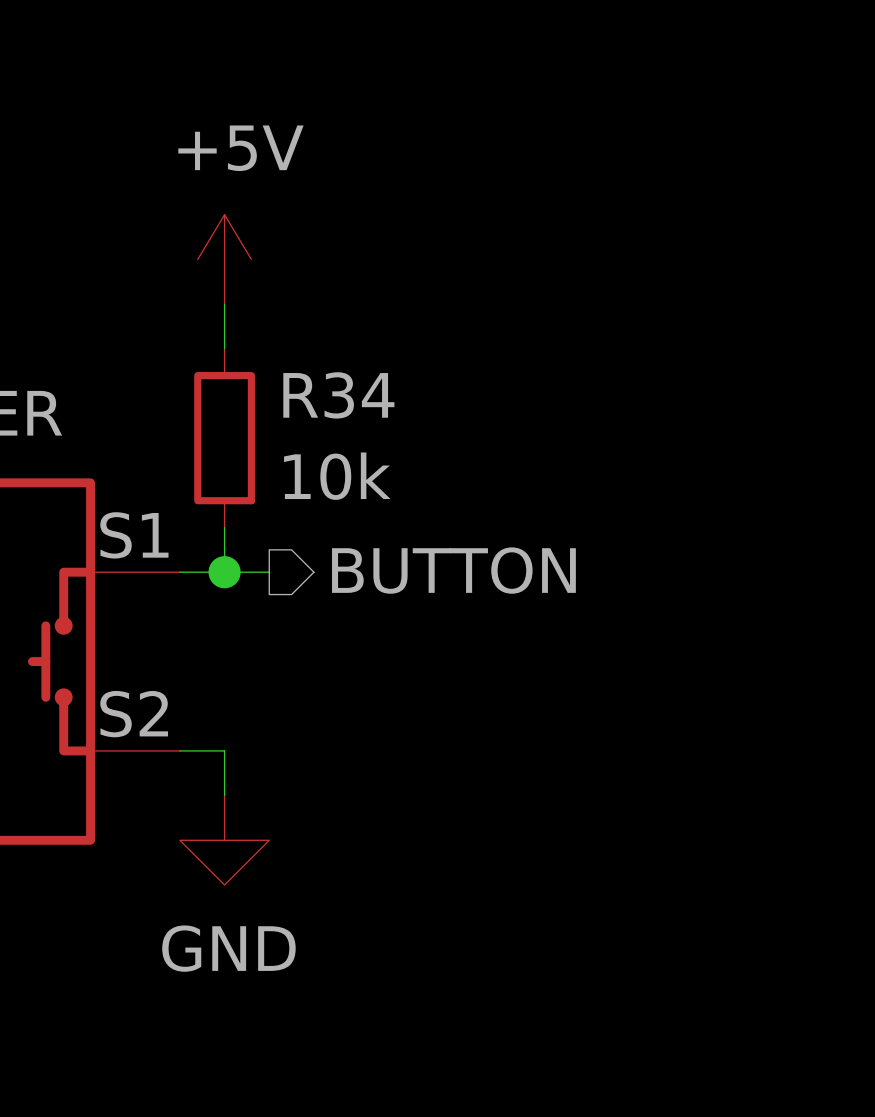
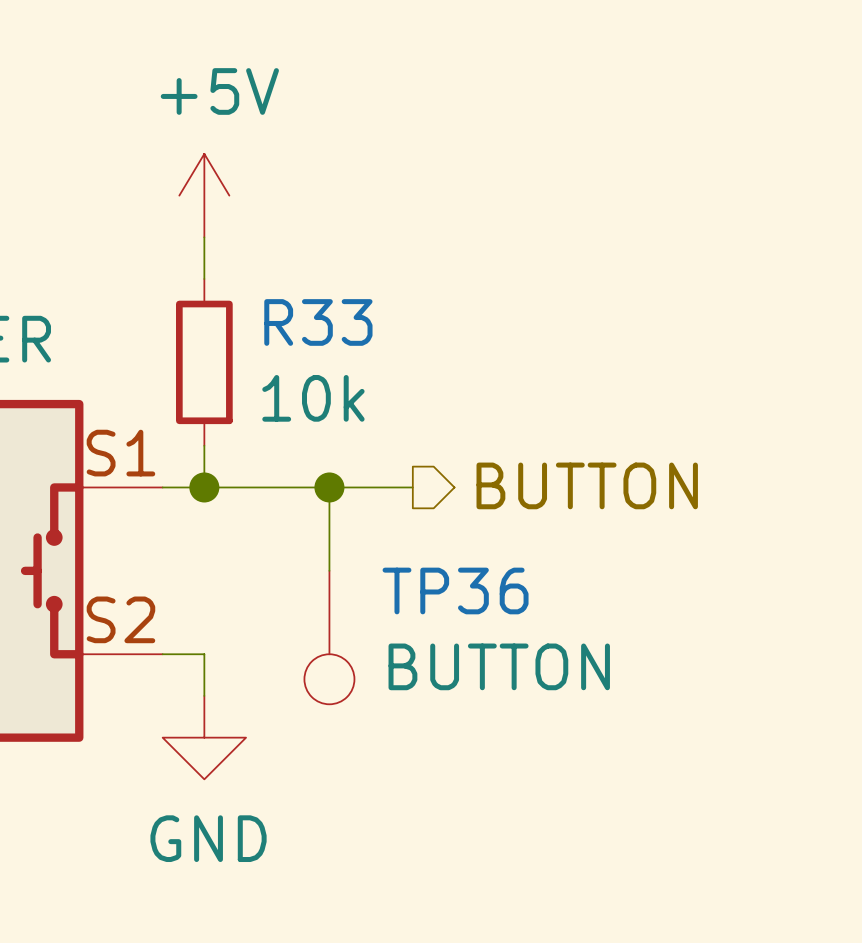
R34 name: R34 (338, 395) -> R33 (318, 322)
hierarchical label position: BUTTON (453, 570) -> BUTTON (587, 485)
wire: none -> (246, 487) (412, 487)
wire: none -> (329, 487) (329, 570)
junction: none -> (329, 487)
TP36: none -> BUTTON (329, 637)

